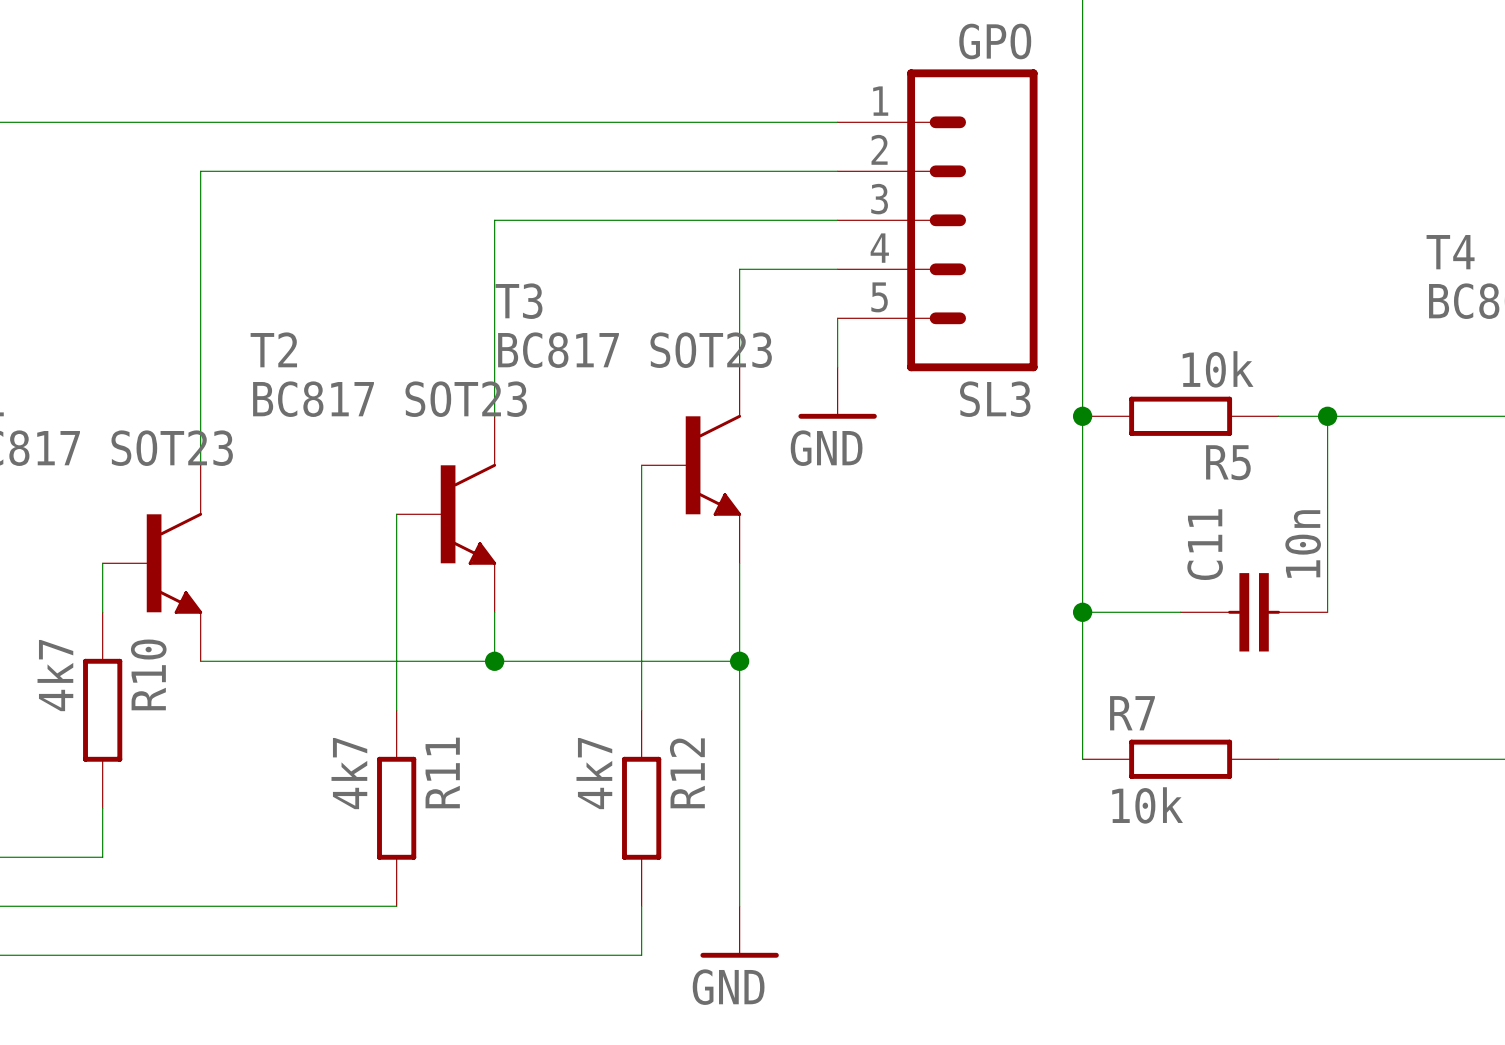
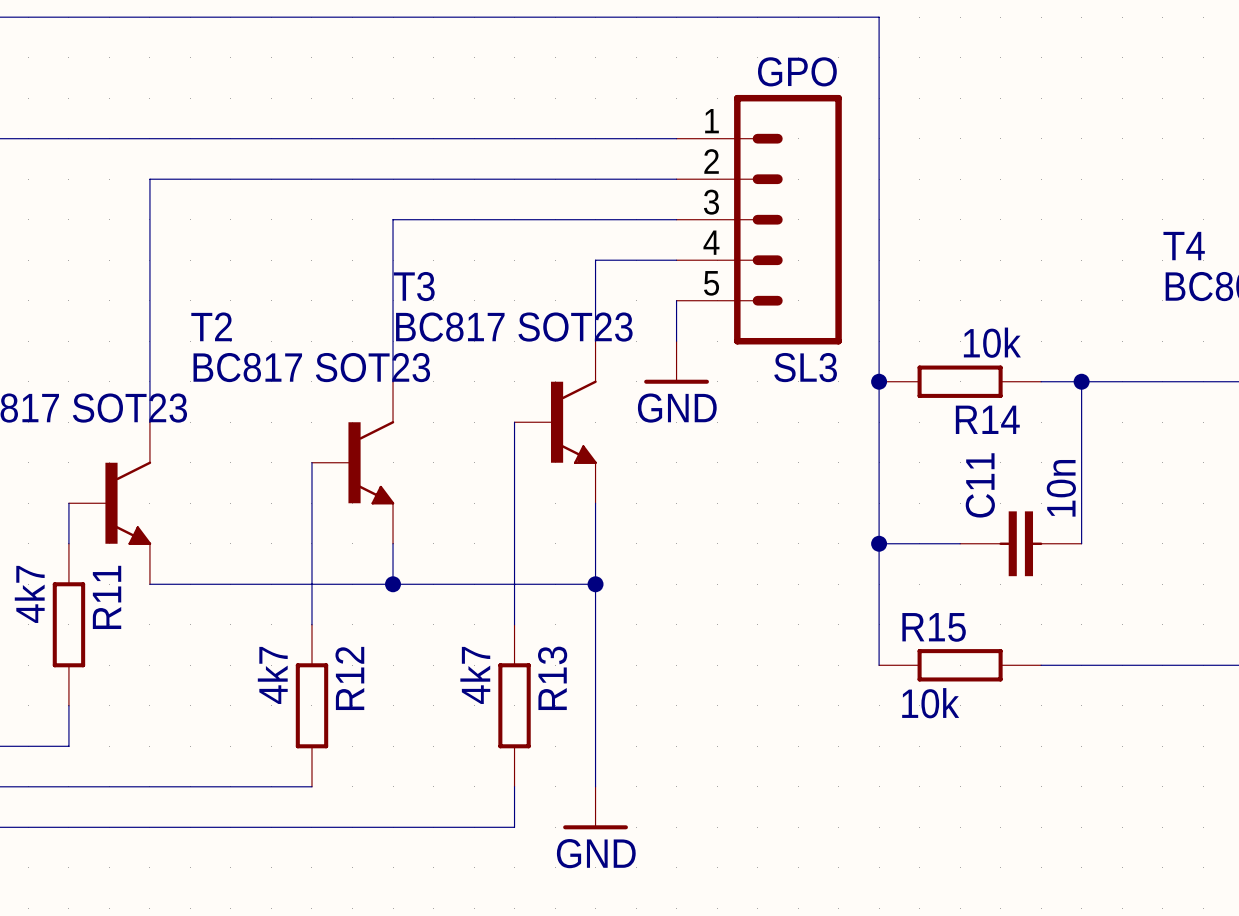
R5 name: R5 (1228, 462) -> R14 (987, 419)
R10 name: R10 (148, 674) -> R11 (107, 597)
R7 name: R7 (1132, 713) -> R15 (934, 627)
R11 name: R11 (442, 772) -> R12 (349, 678)
R12 name: R12 (687, 773) -> R13 (552, 678)

